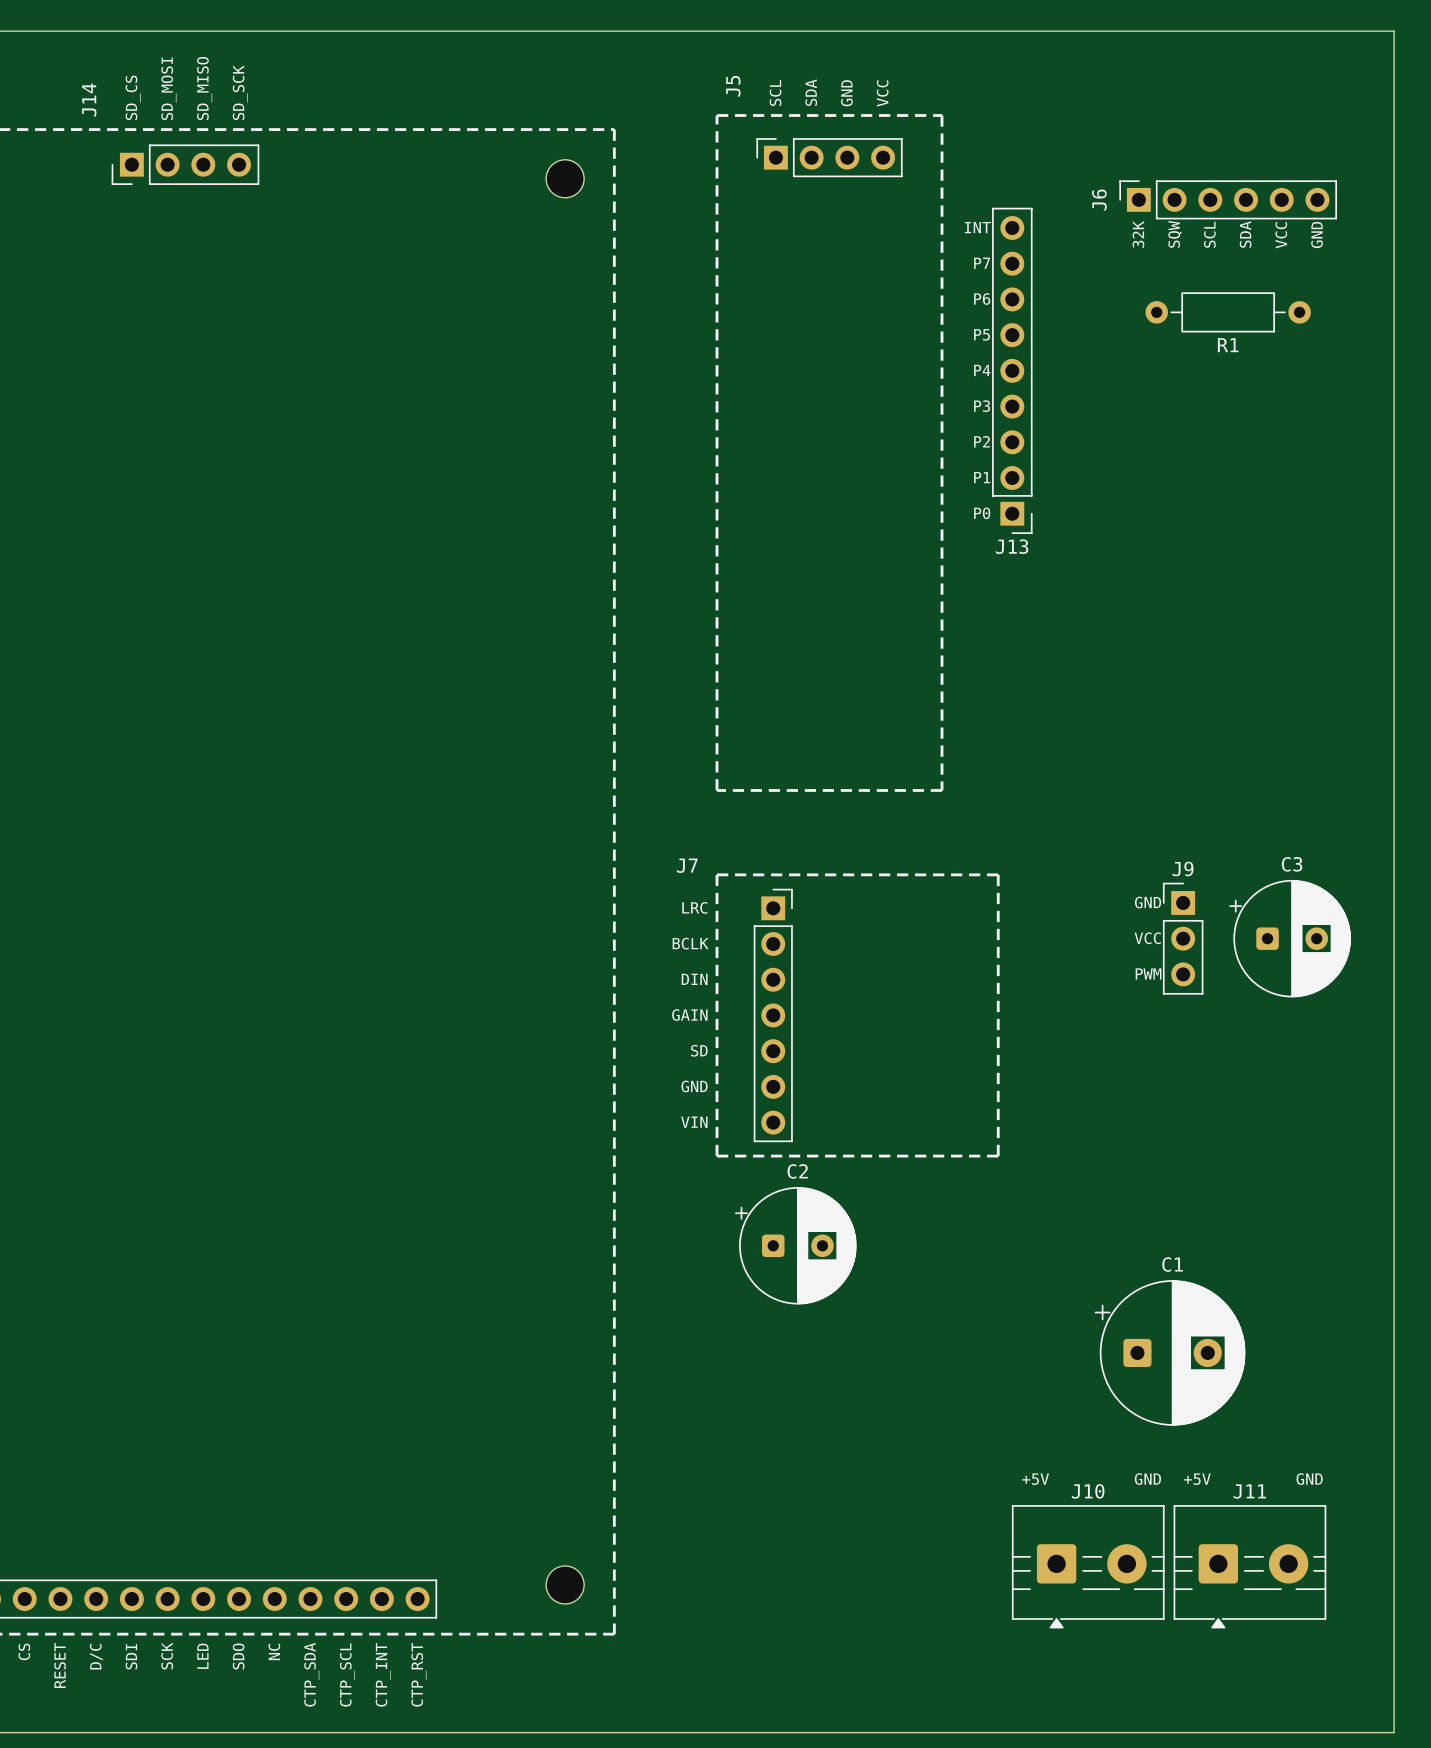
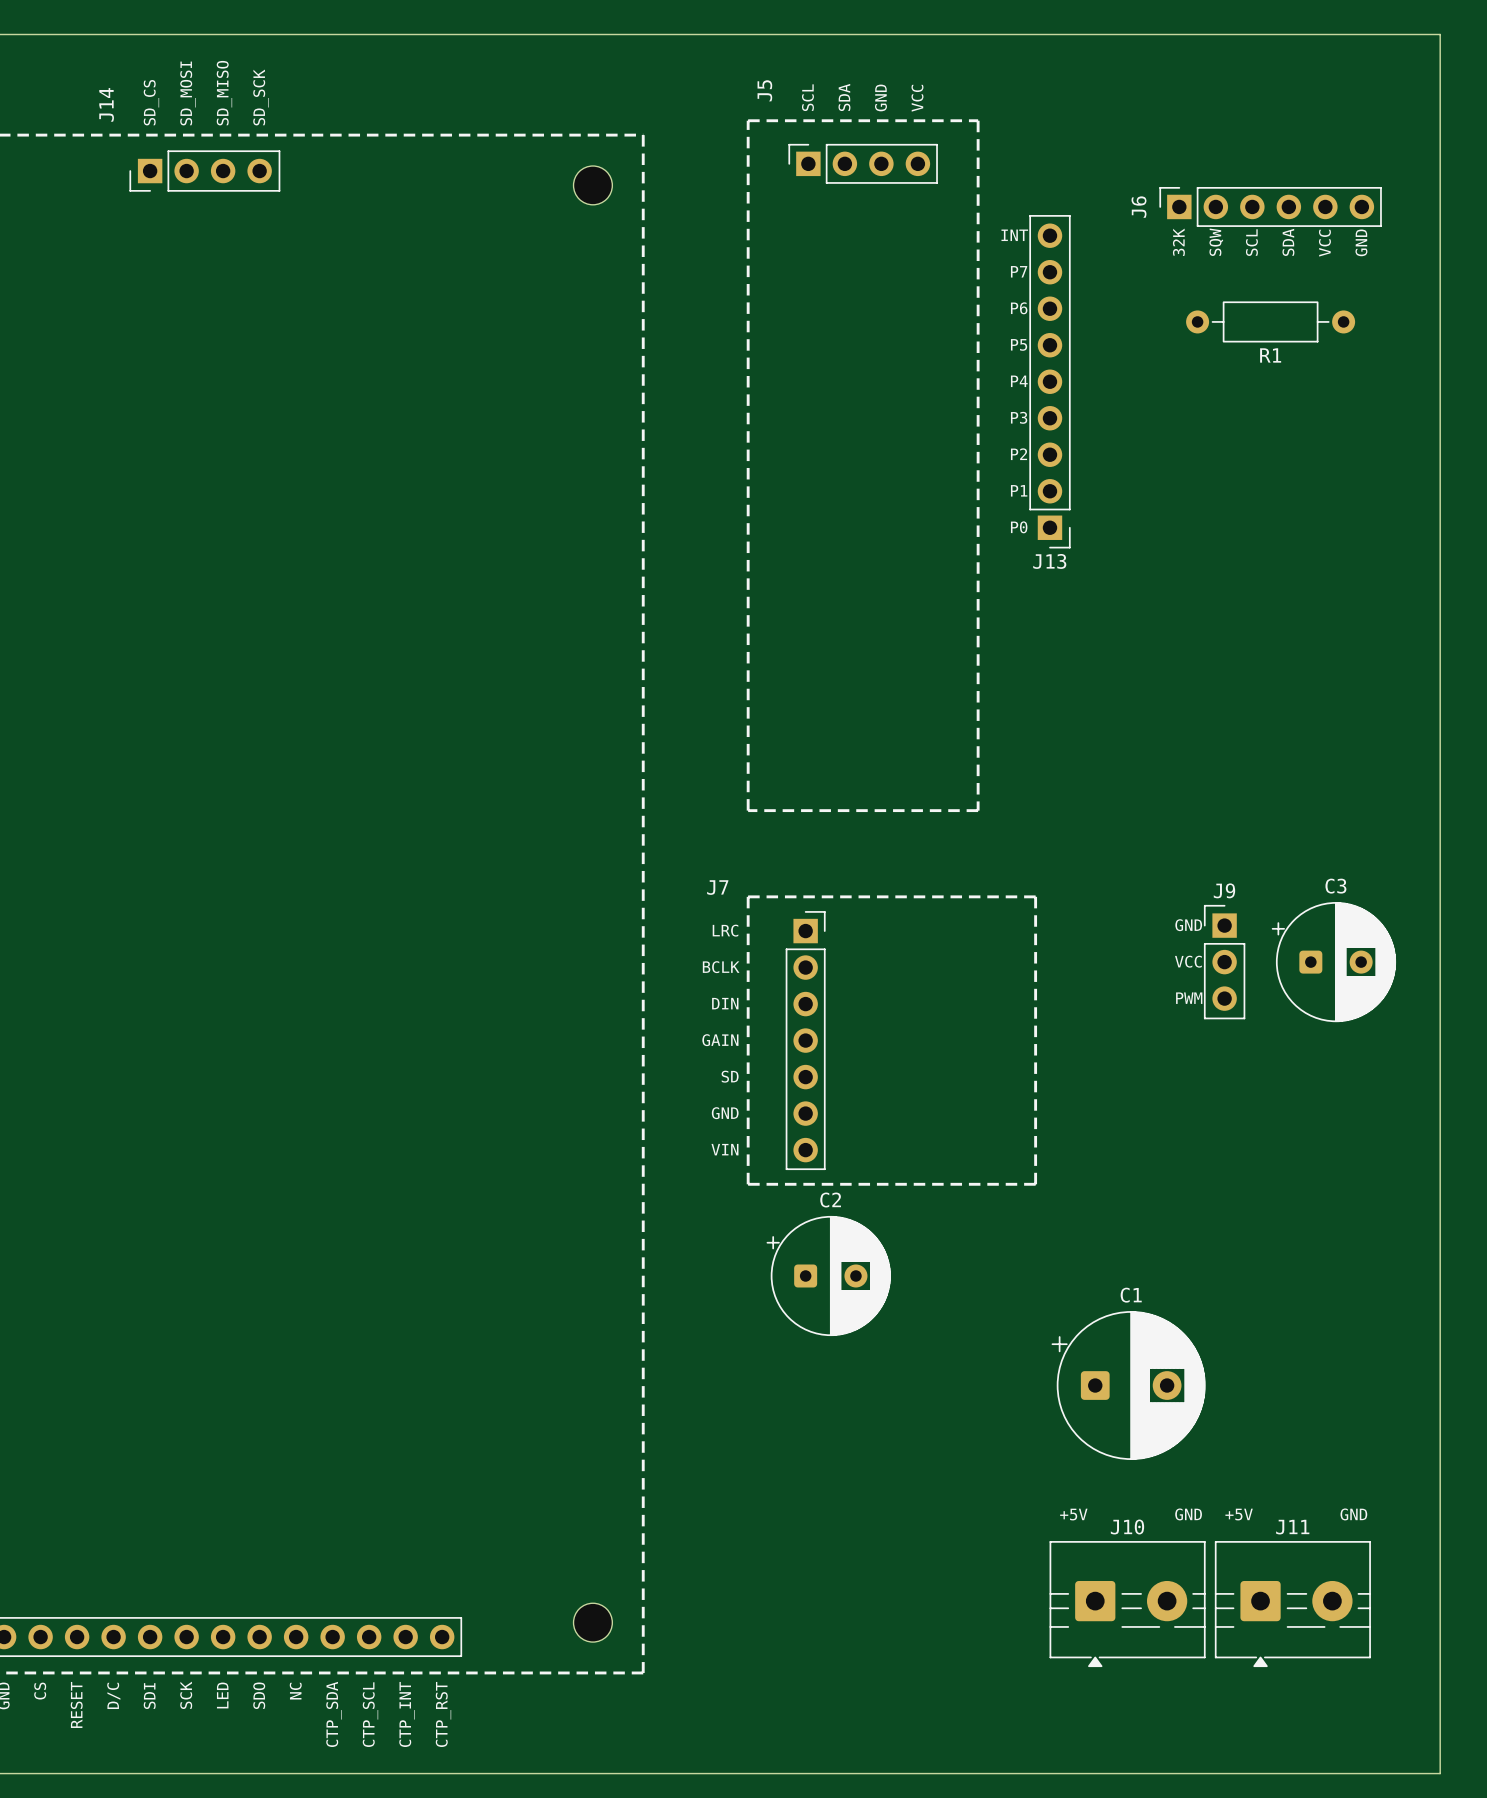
C1 position: (1170, 1352) -> (1128, 1385)

